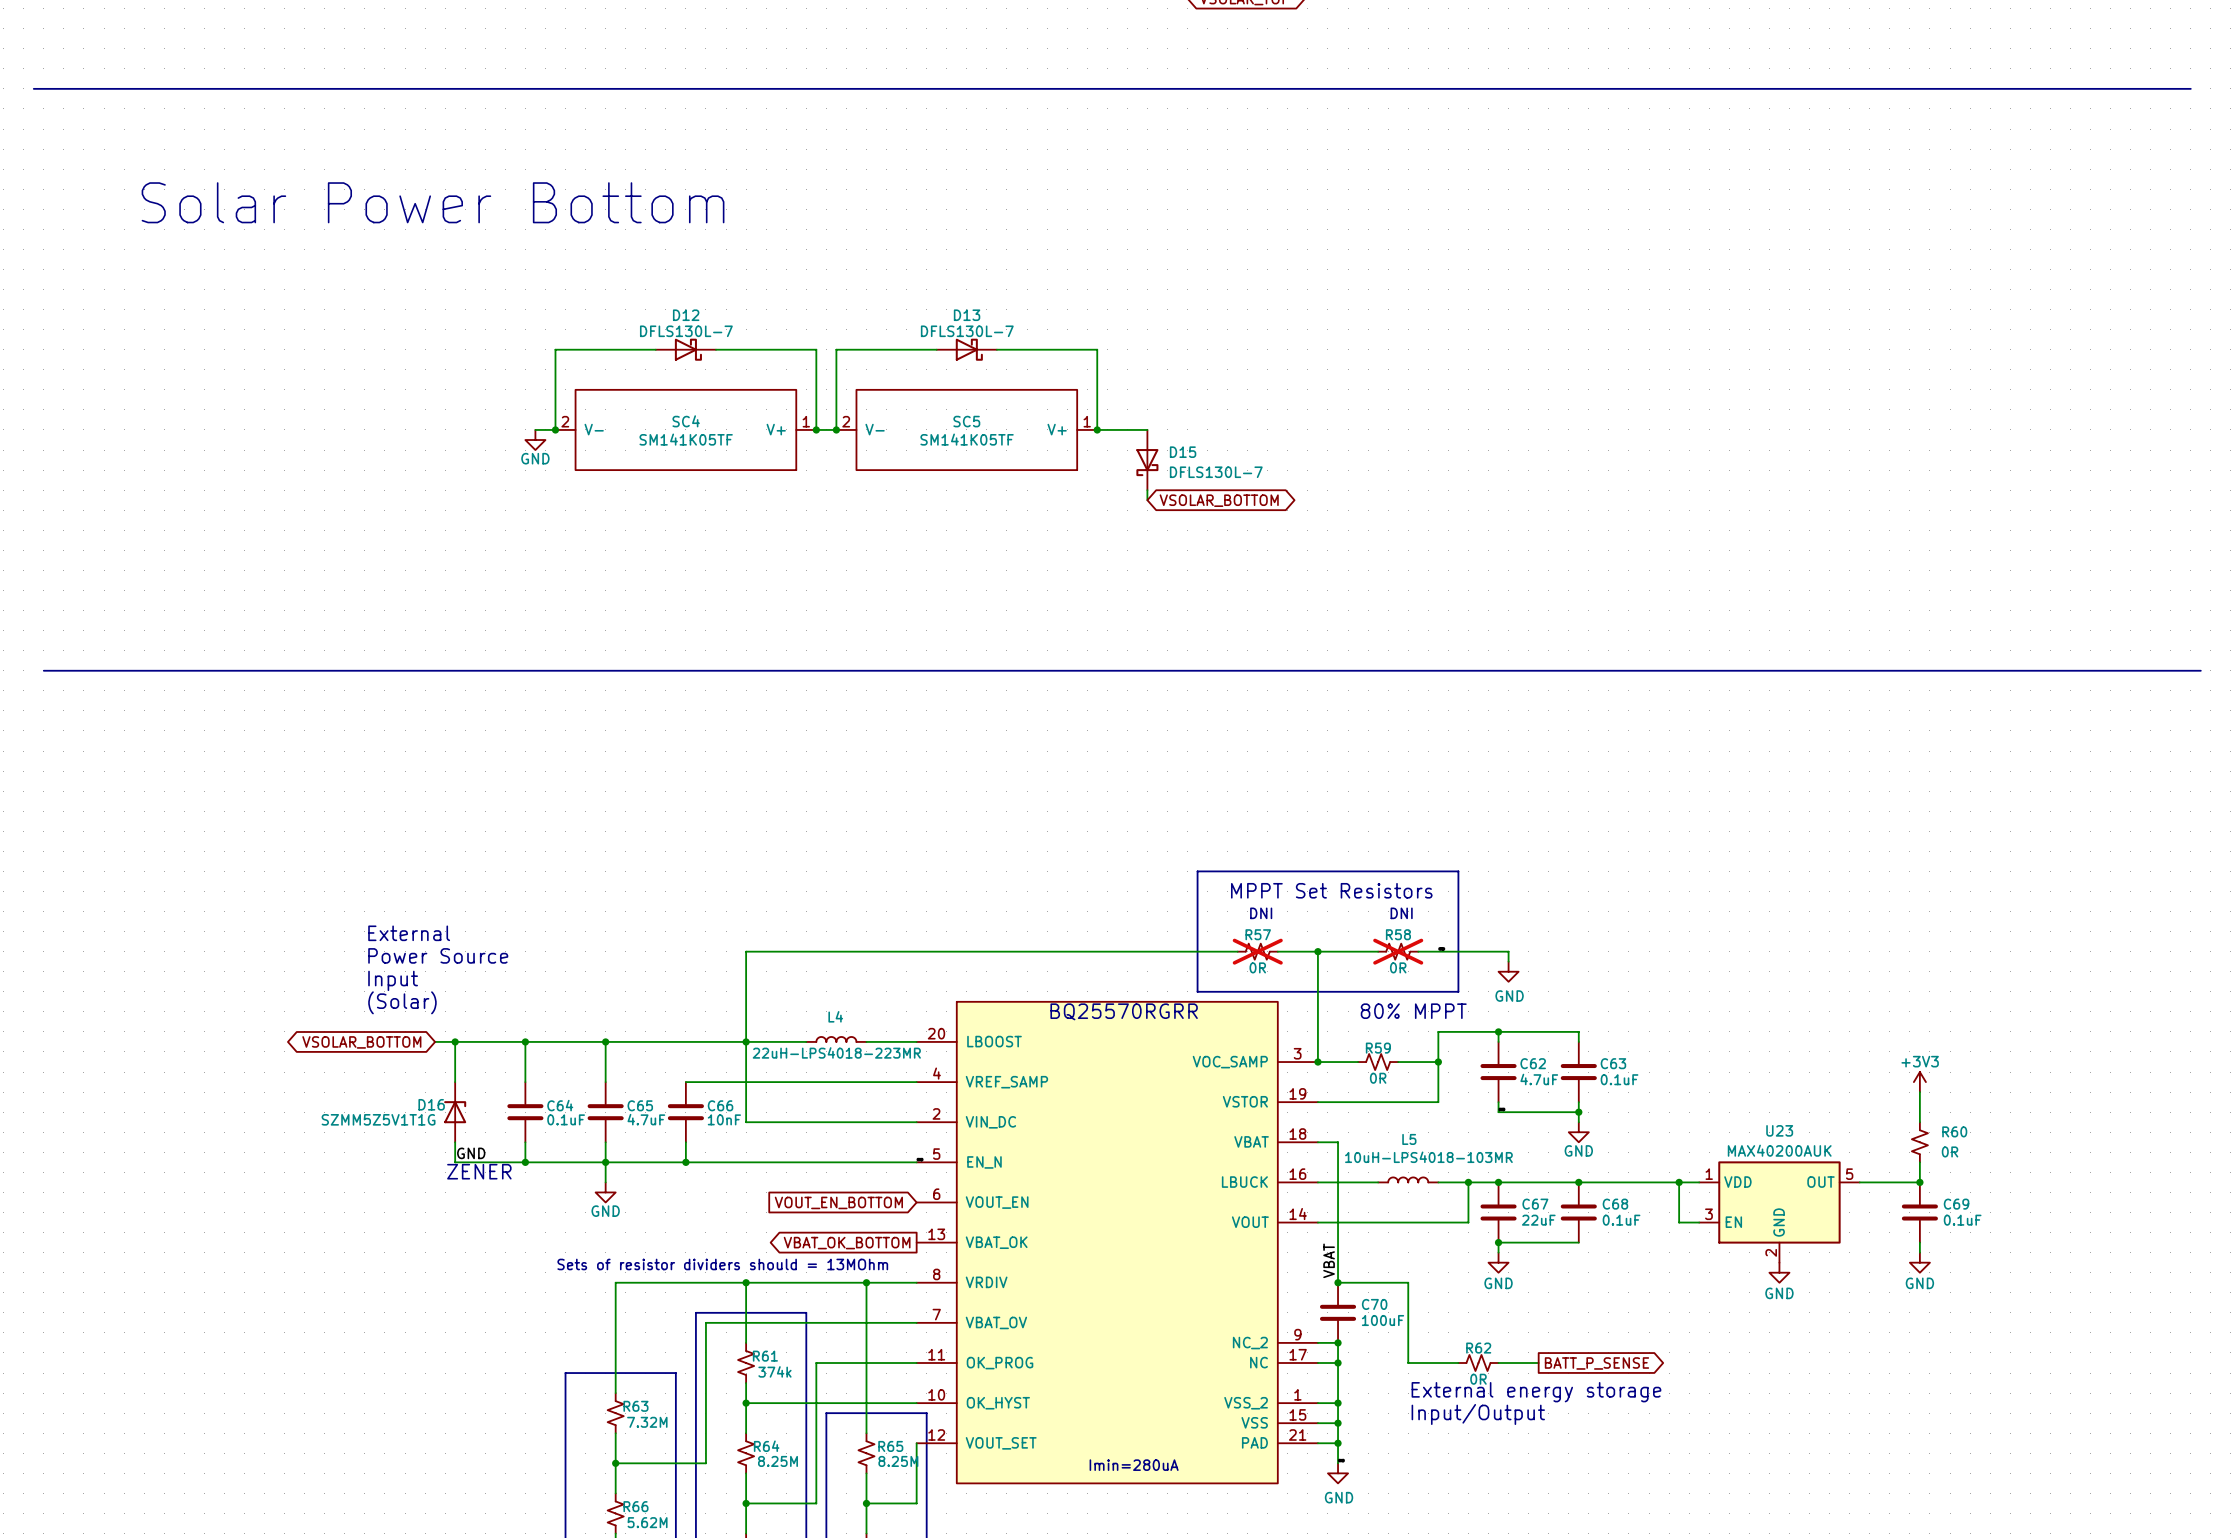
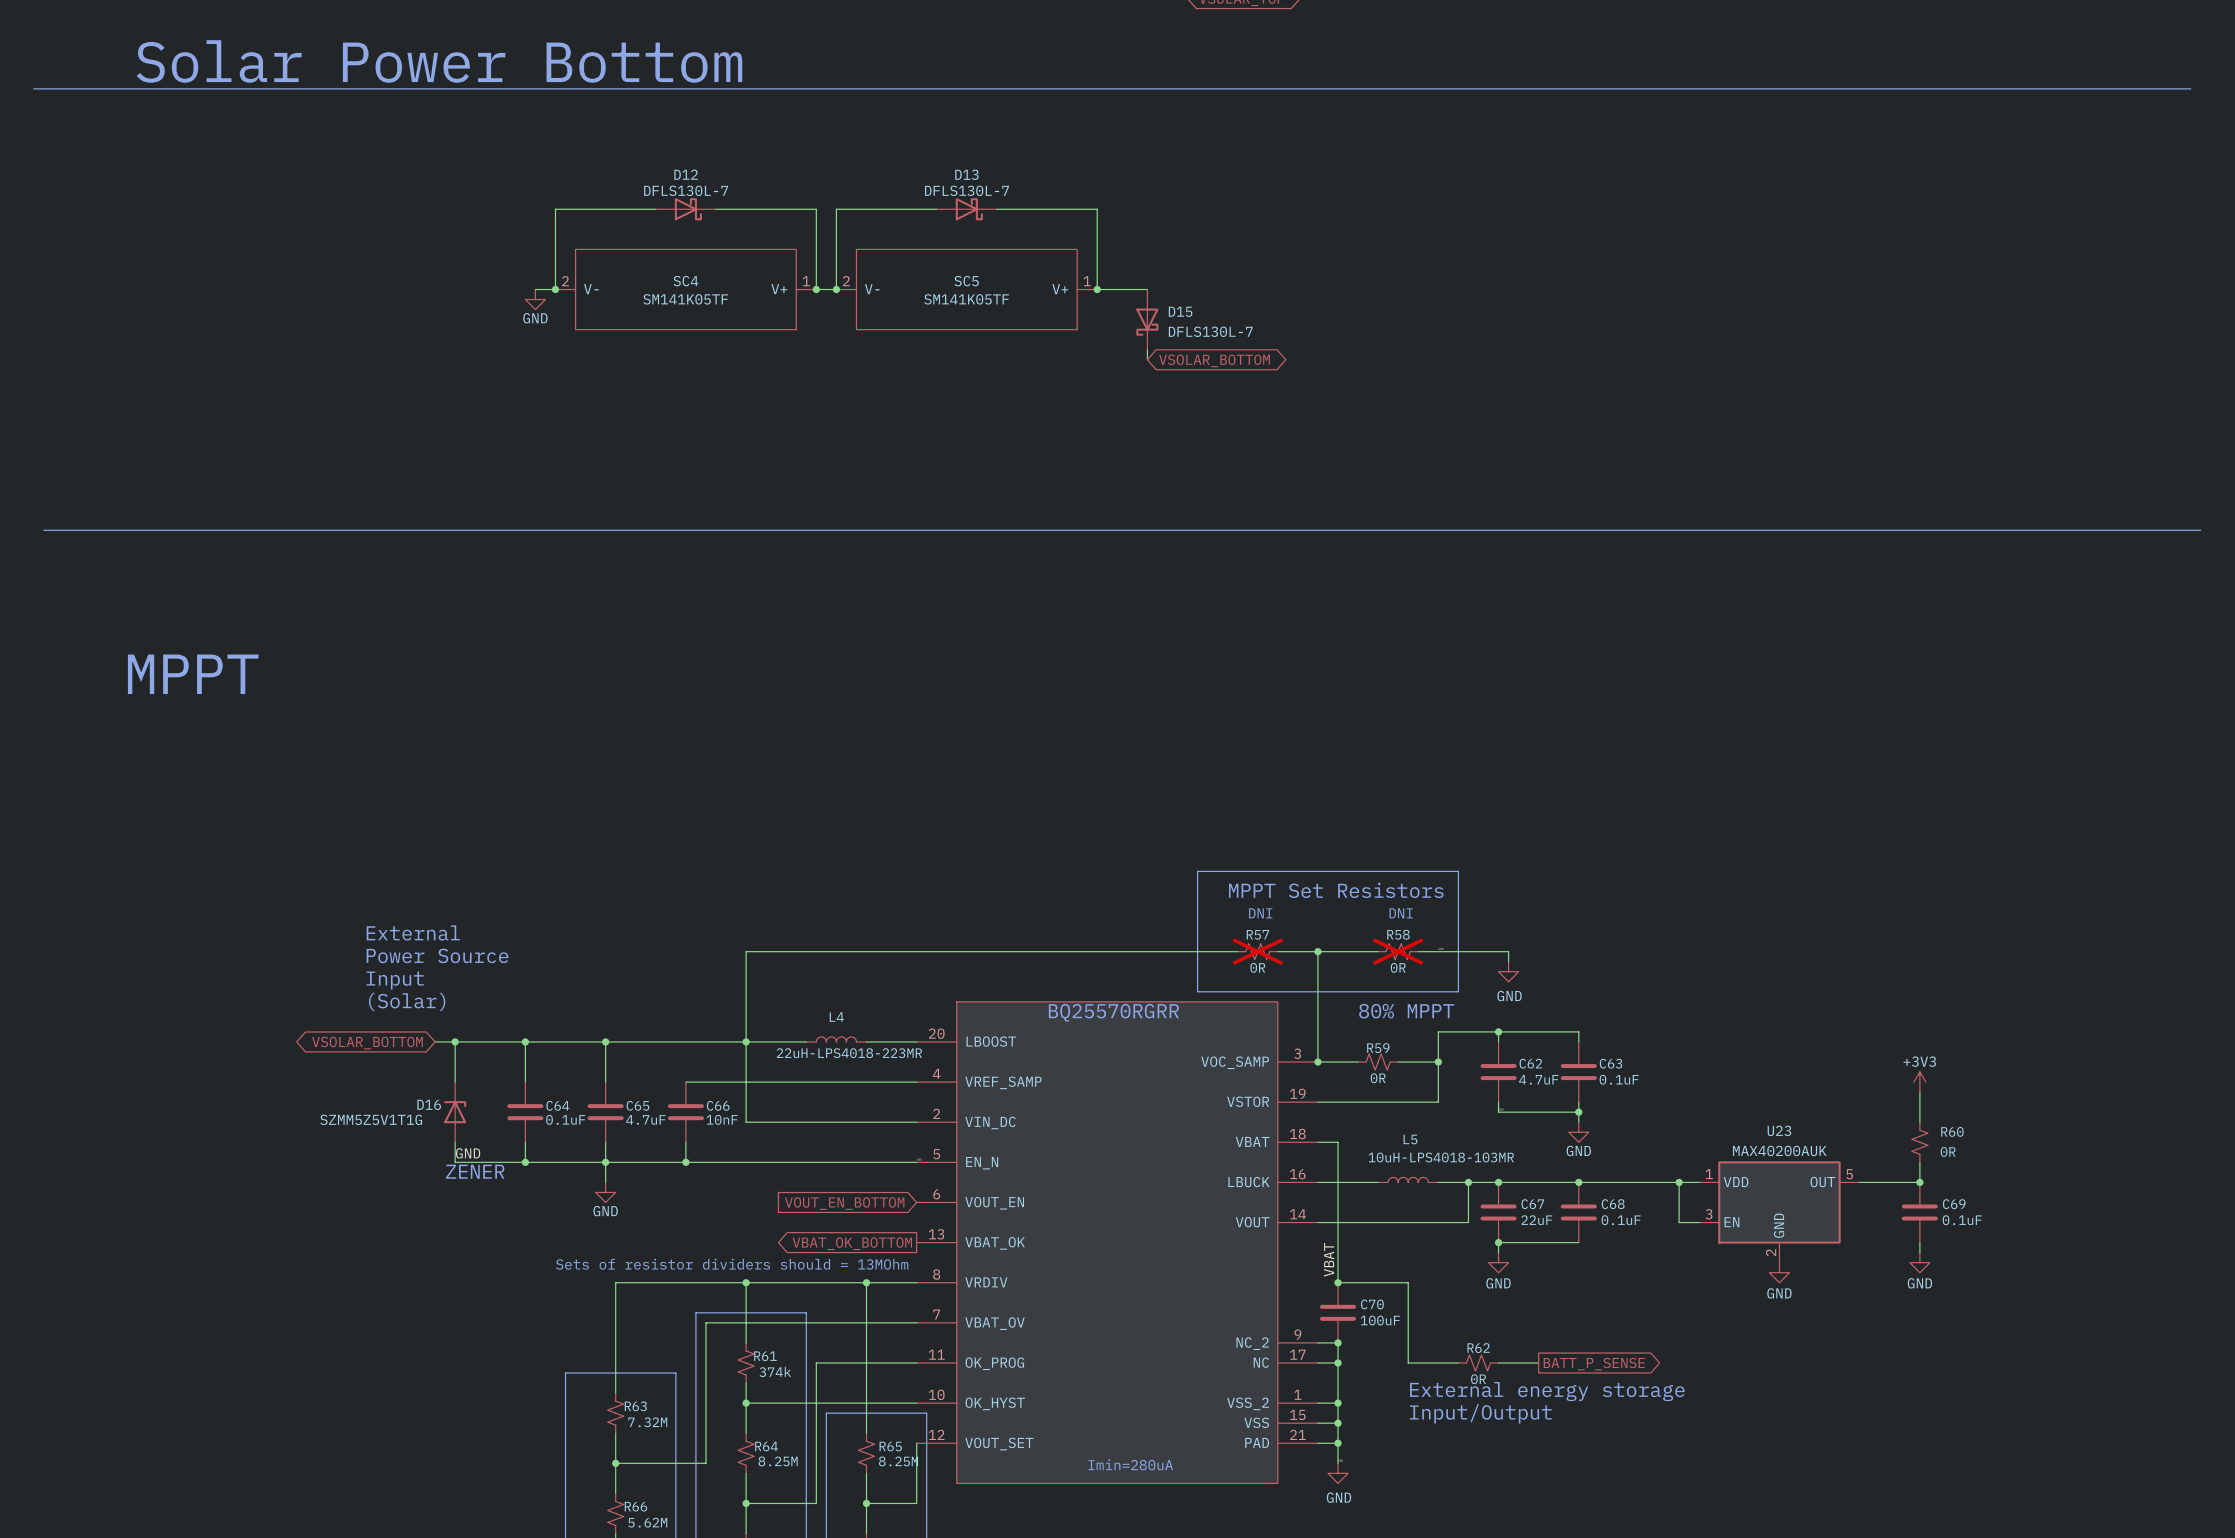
text position: Solar Power Bottom (433, 202) -> Solar Power Bottom (439, 61)
junction: none -> (555, 289)
junction: none -> (816, 289)
junction: none -> (836, 289)
junction: none -> (1097, 289)
wire: (655, 349) (555, 349) (555, 429) (535, 429) -> (655, 209) (555, 209) (555, 289) (535, 289)
D12 position: (685, 349) -> (685, 209)
wire: (716, 349) (816, 349) (816, 429) (836, 429) (836, 349) (936, 349) -> (716, 209) (816, 209) (816, 289) (836, 289) (836, 209) (936, 209)
D13 position: (966, 349) -> (966, 209)
wire: (996, 349) (1097, 349) (1097, 429) (1147, 429) -> (996, 209) (1097, 209) (1097, 289) (1147, 289)
junction: (555, 429) -> none
SC4 position: (685, 429) -> (685, 289)
junction: (816, 429) -> none
junction: (836, 429) -> none
SC5 position: (966, 429) -> (966, 289)
junction: (1097, 429) -> none
power symbol position: GND (535, 440) -> GND (535, 299)
D15 position: (1147, 460) -> (1147, 319)
wire: (1147, 490) (1147, 500) -> (1147, 349) (1147, 359)
global label position: VSOLAR_BOTTOM (1219, 500) -> VSOLAR_BOTTOM (1214, 360)
line: (43, 670) (2200, 670) -> (43, 530) (2200, 530)
text: none -> MPPT (193, 674)

